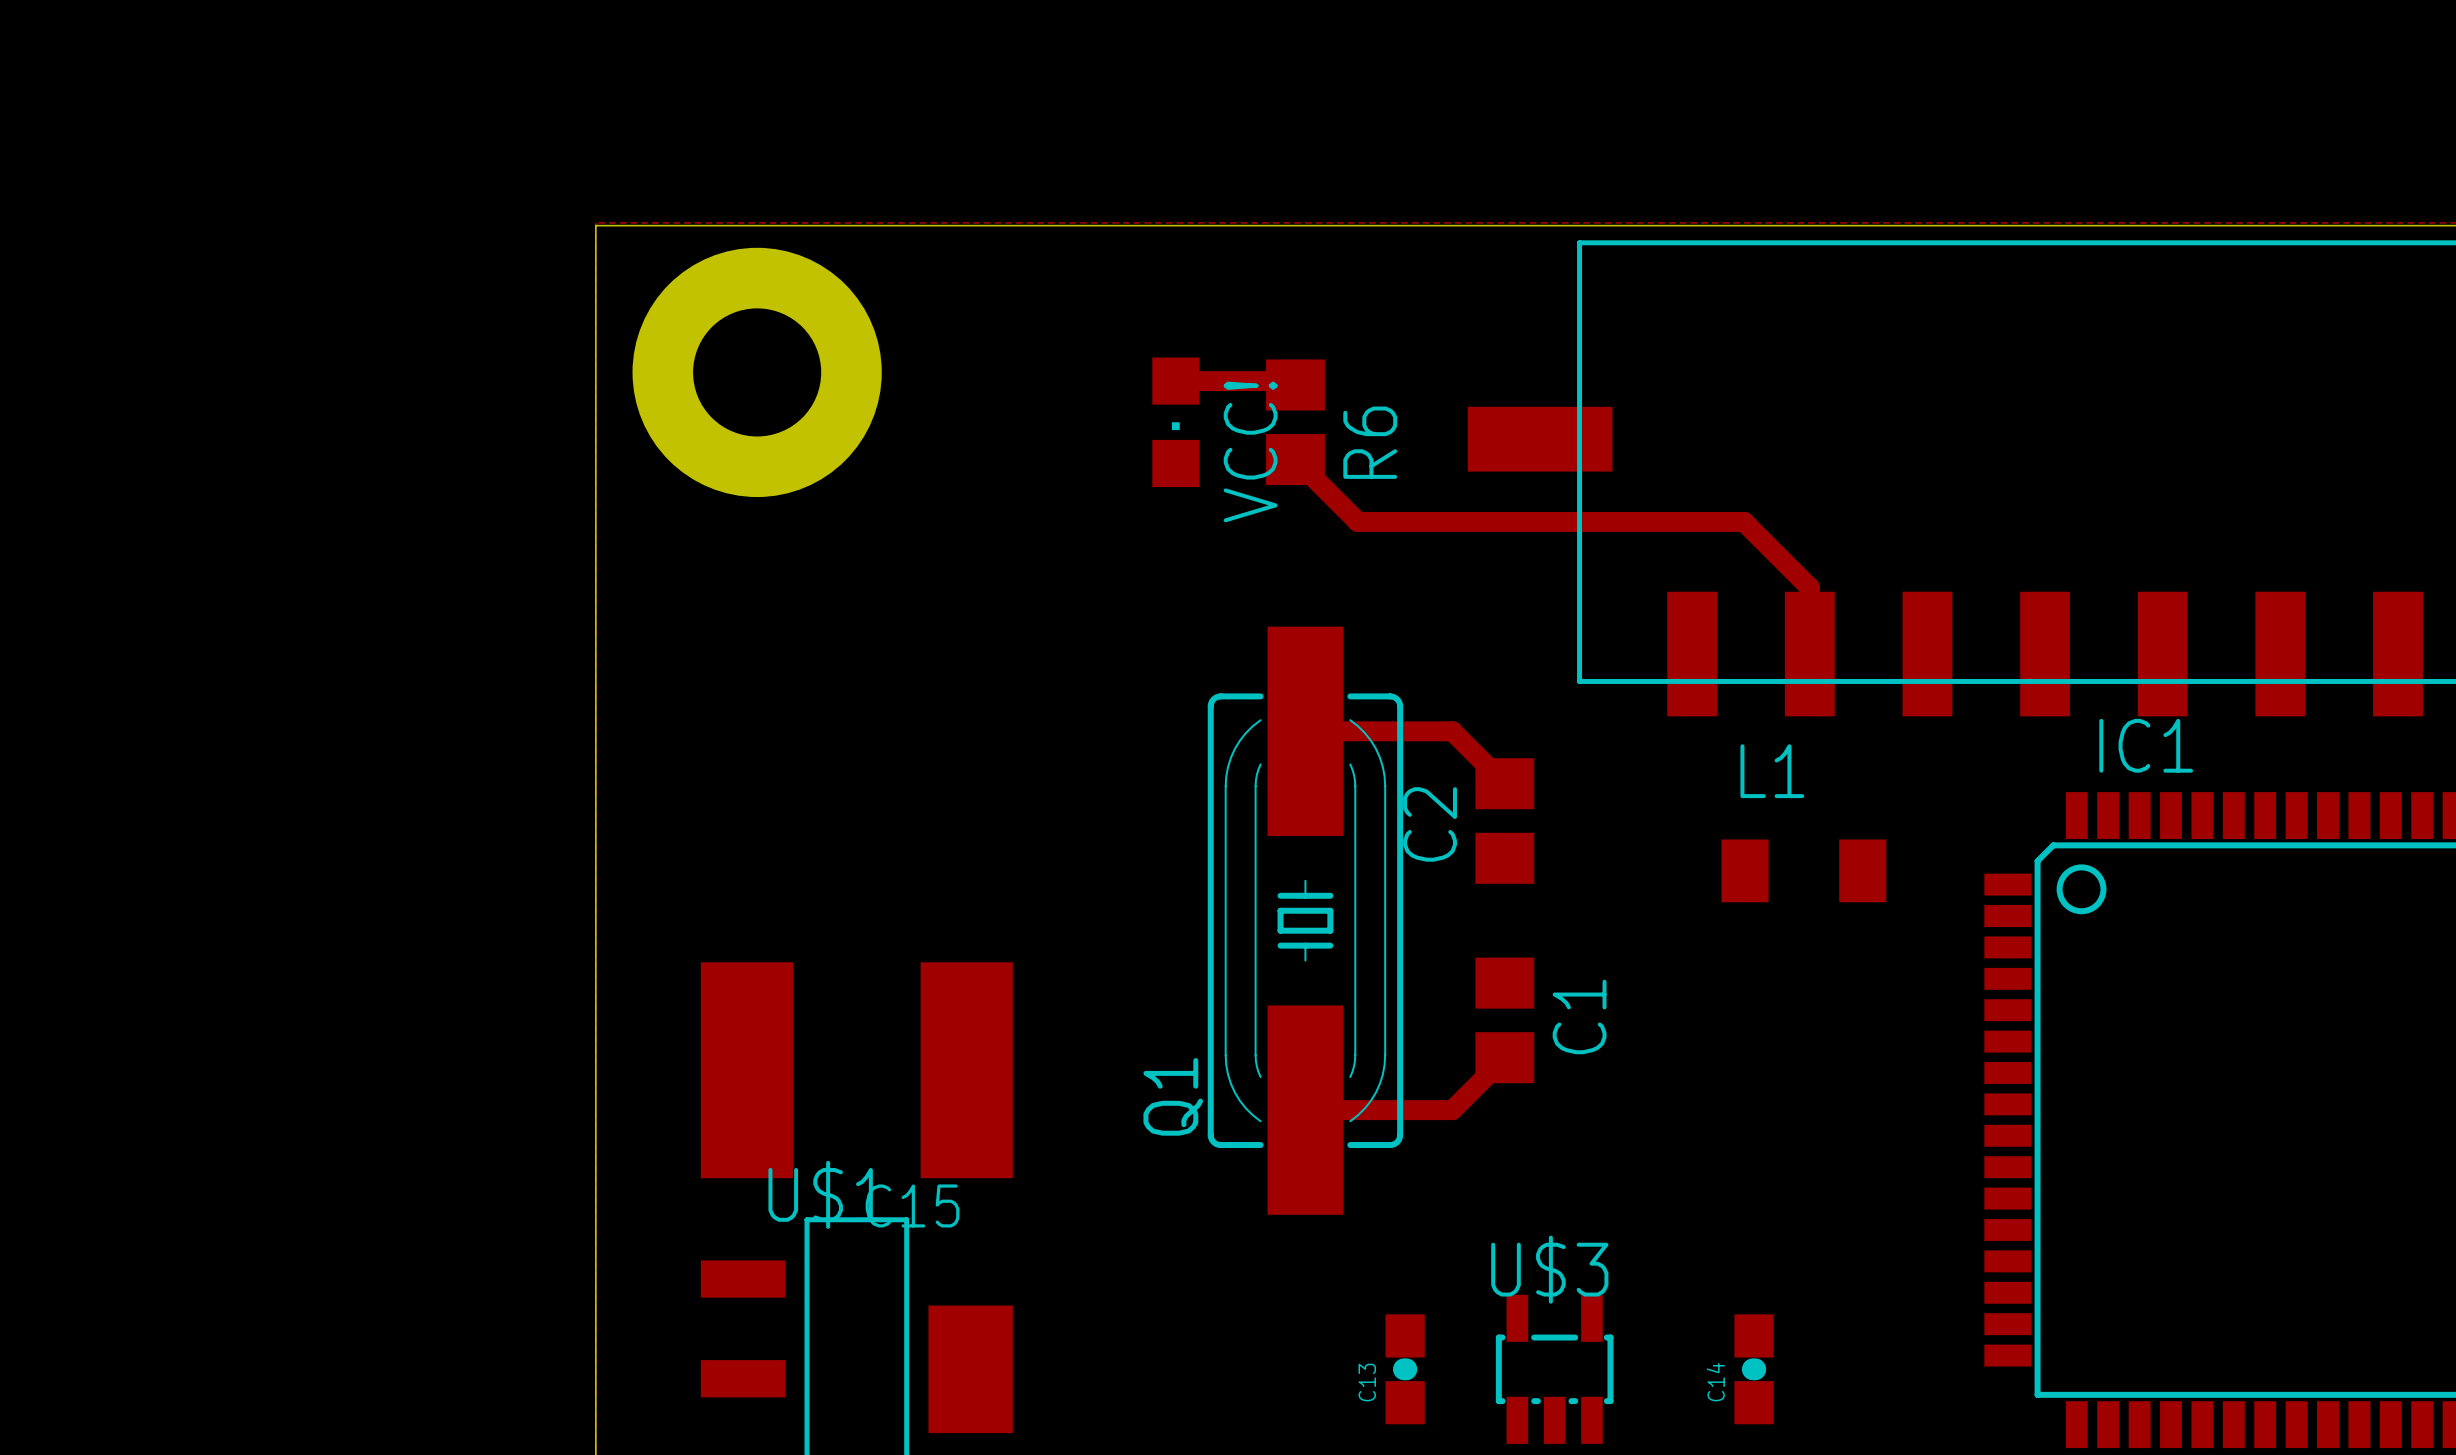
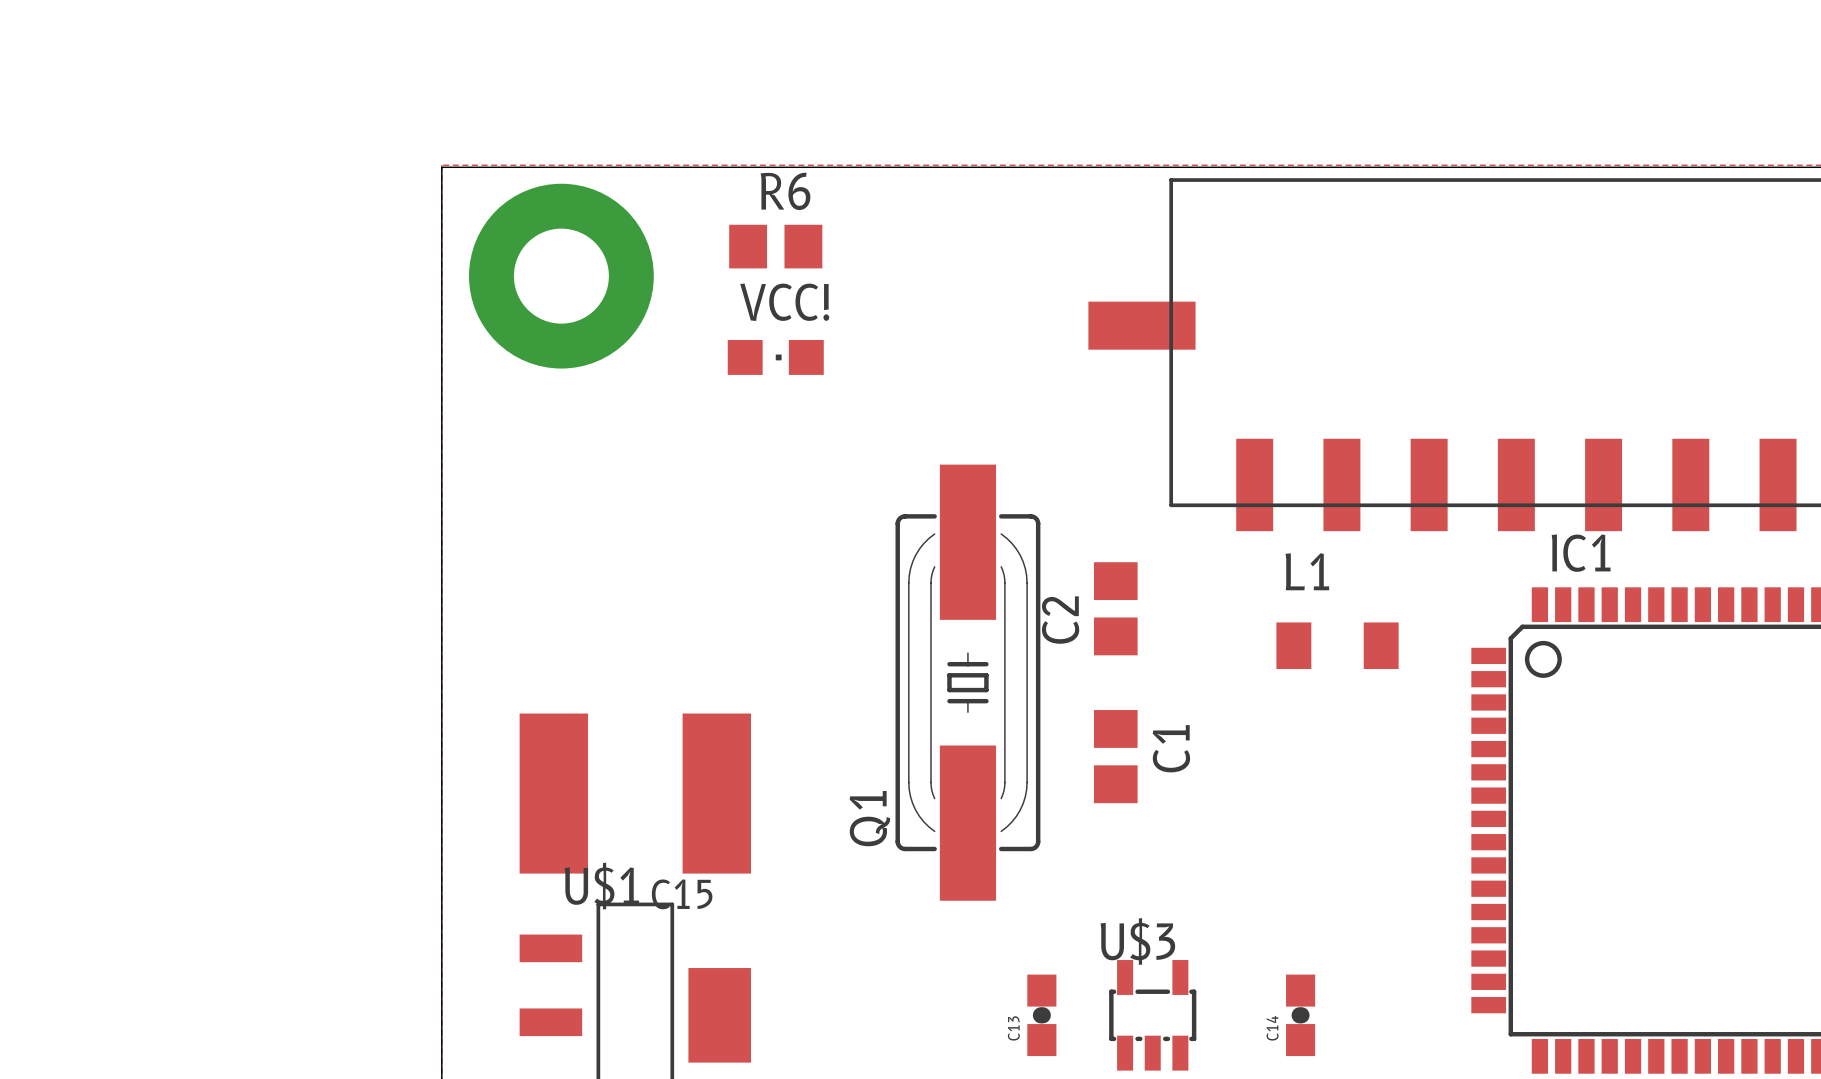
track: (1175, 381) (1291, 381) (1295, 384) -> none
VCC! rotation: 0° (1175, 422) -> 90° counterclockwise (775, 357)
VCC! position: (1175, 422) -> (775, 357)
R6 rotation: 0° (1295, 422) -> 90° clockwise (775, 246)
R6 position: (1295, 422) -> (775, 246)
R6 name position: R6 (1370, 442) -> R6 (785, 191)
track: (1295, 459) (1357, 521) (1744, 521) (1809, 587) (1809, 654) -> none
track: (1305, 731) (1452, 731) (1504, 783) -> none
track: (1504, 1057) (1452, 1110) (1305, 1110) -> none

